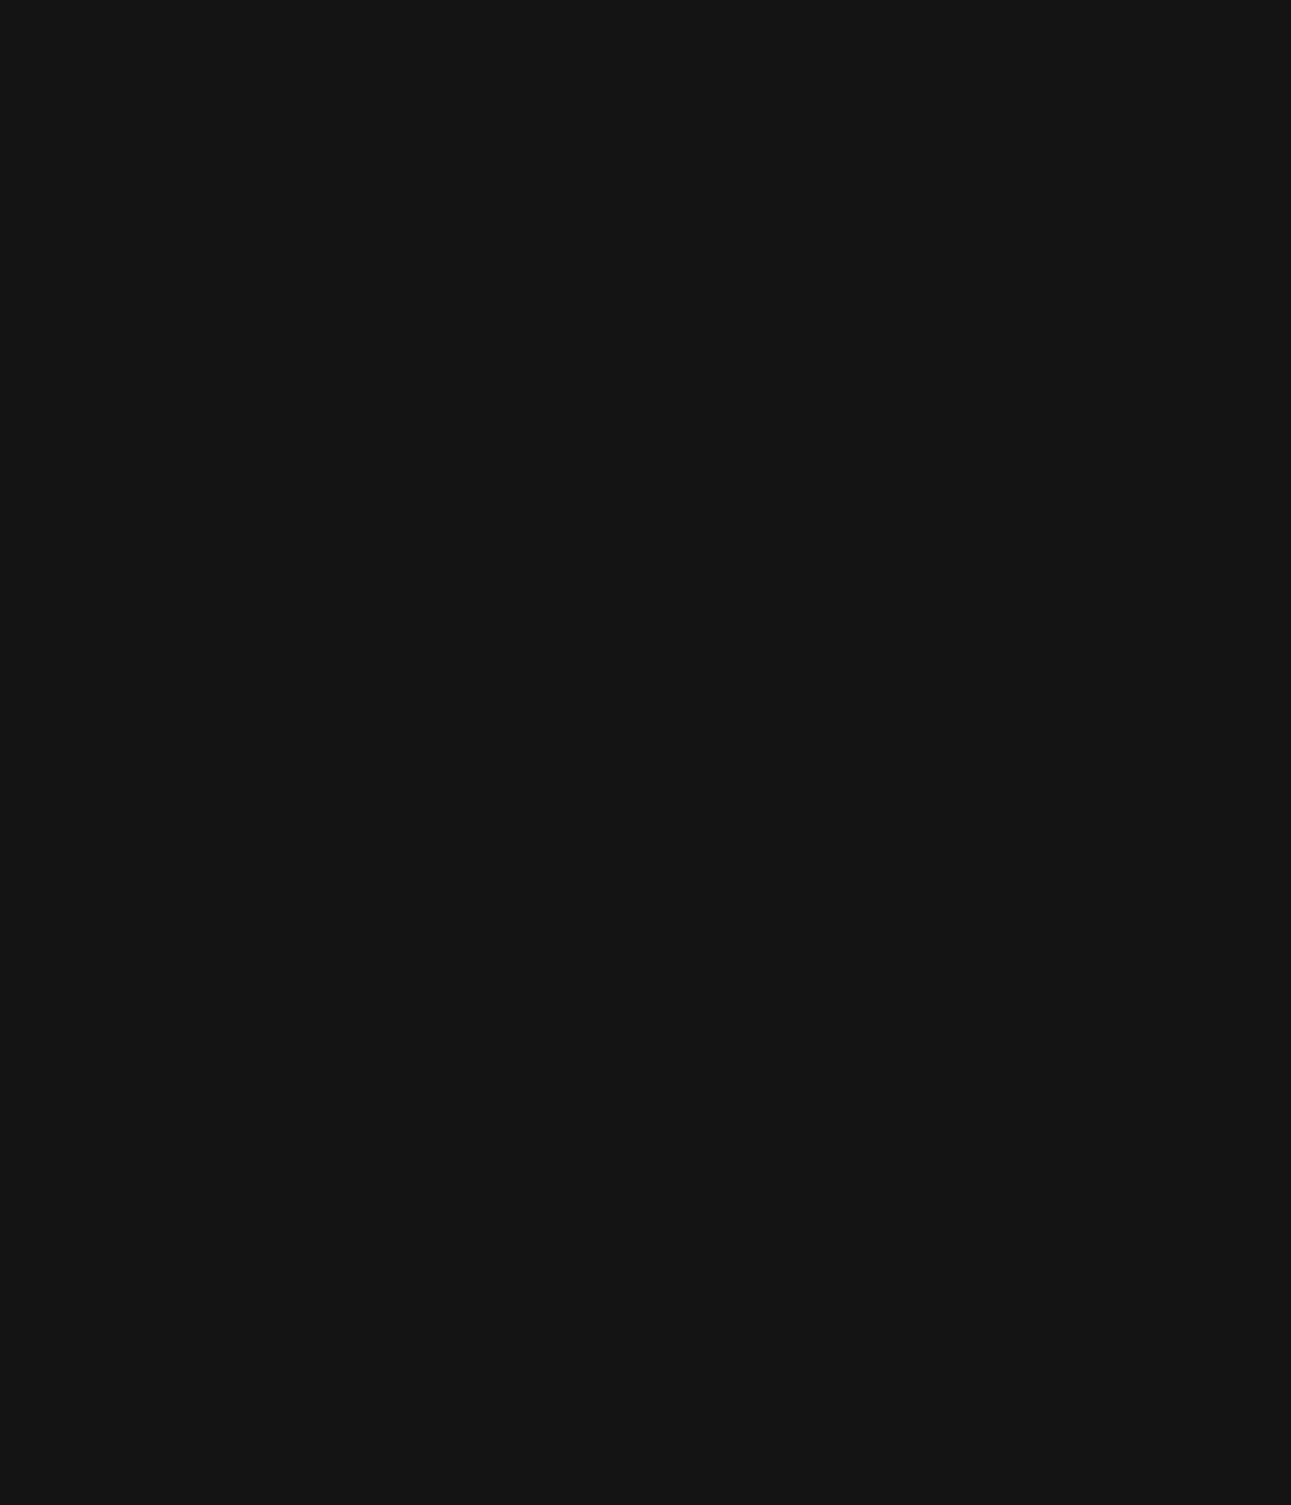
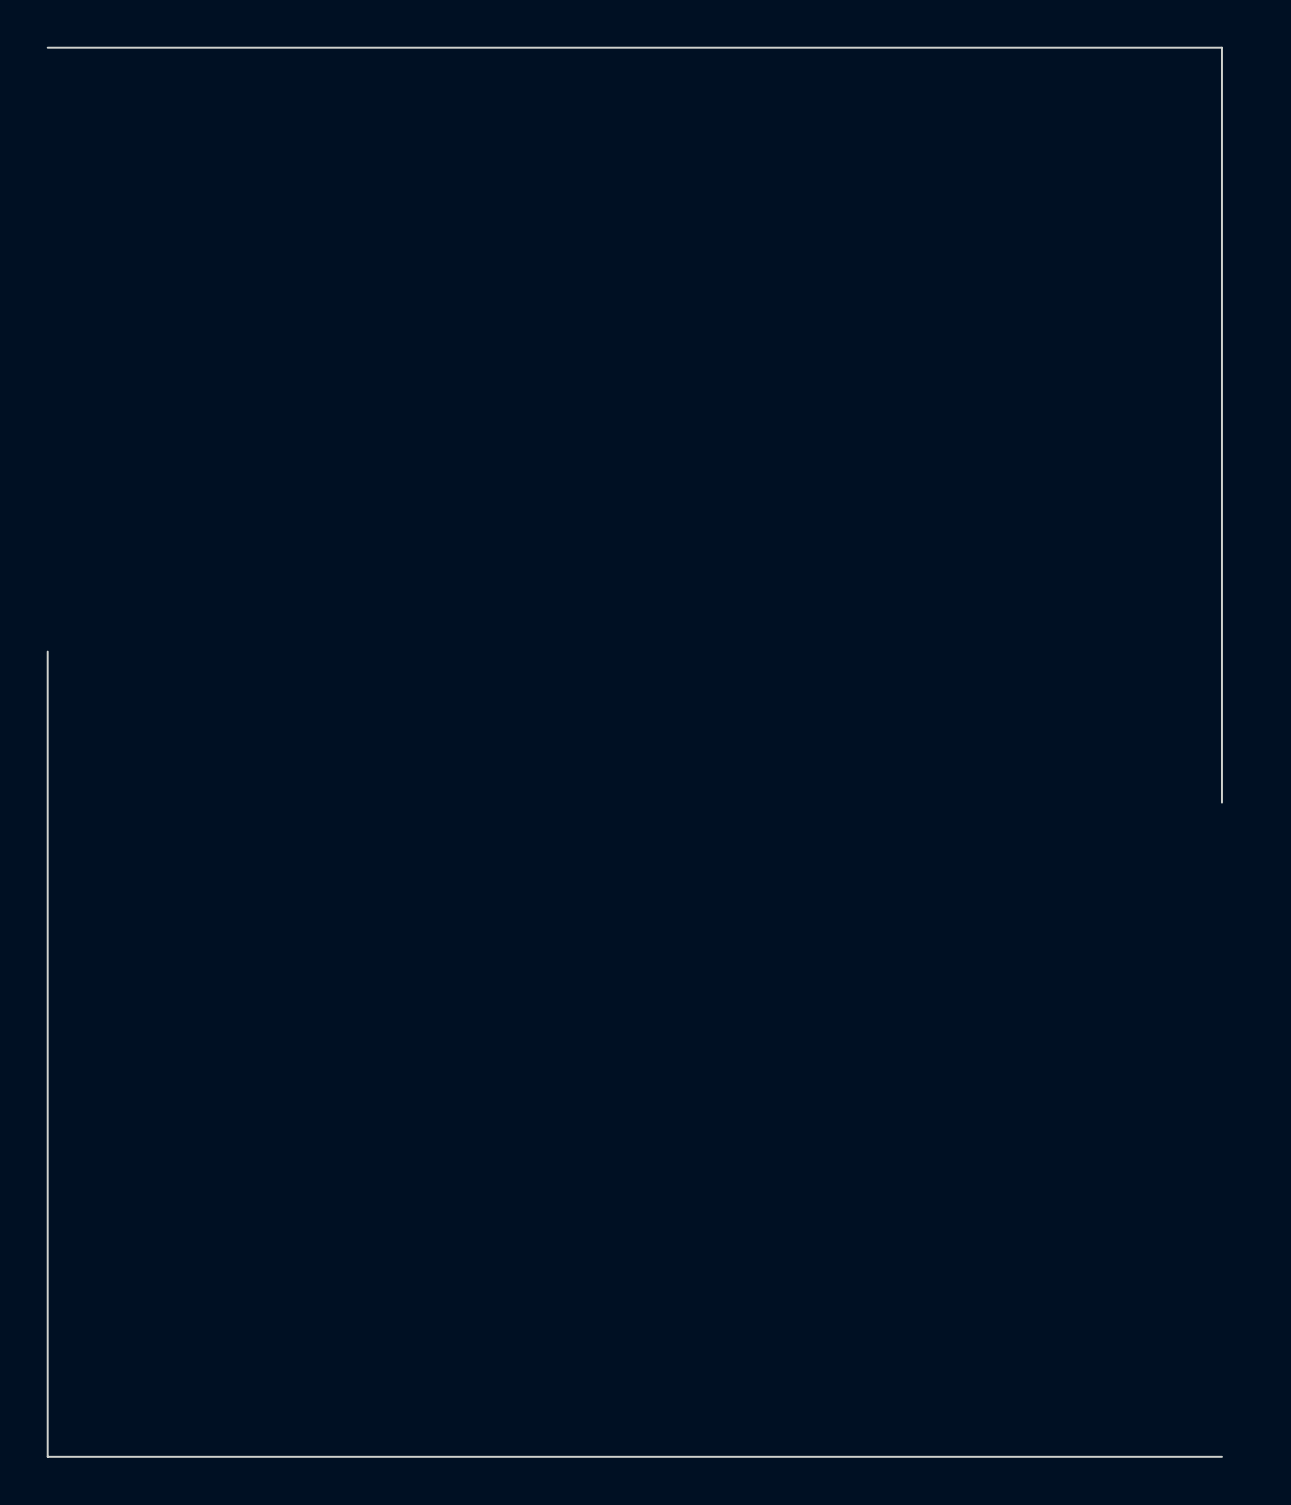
board edge: none -> (47, 47) (1221, 47) (1221, 802)
board edge: none -> (47, 651) (47, 1456) (1221, 1456)

